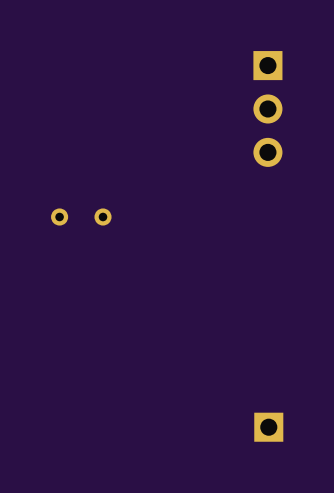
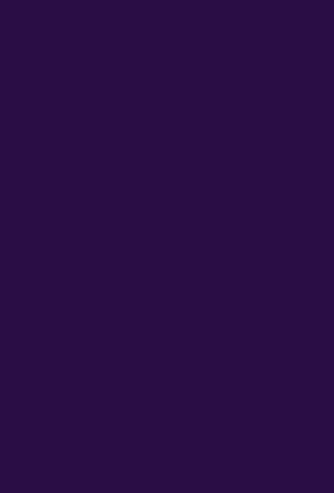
part: (267, 108) -> none
part: (81, 217) -> none
part: (268, 427) -> none

